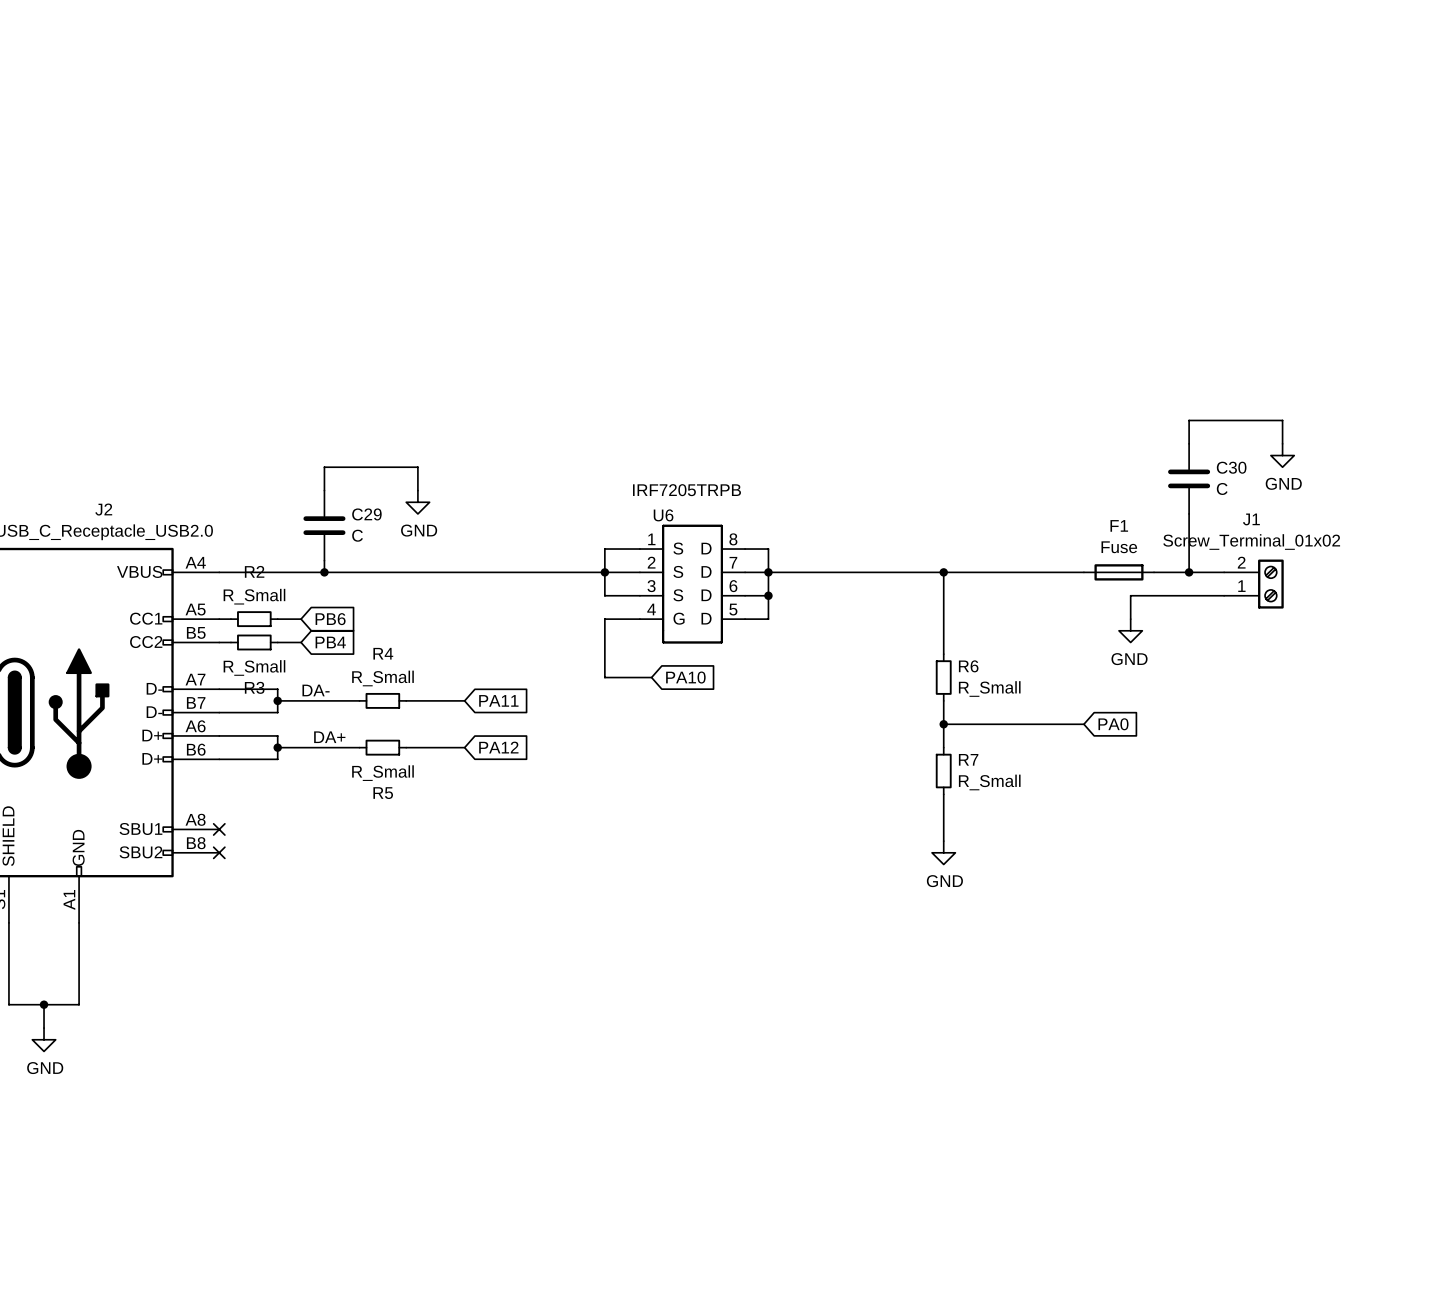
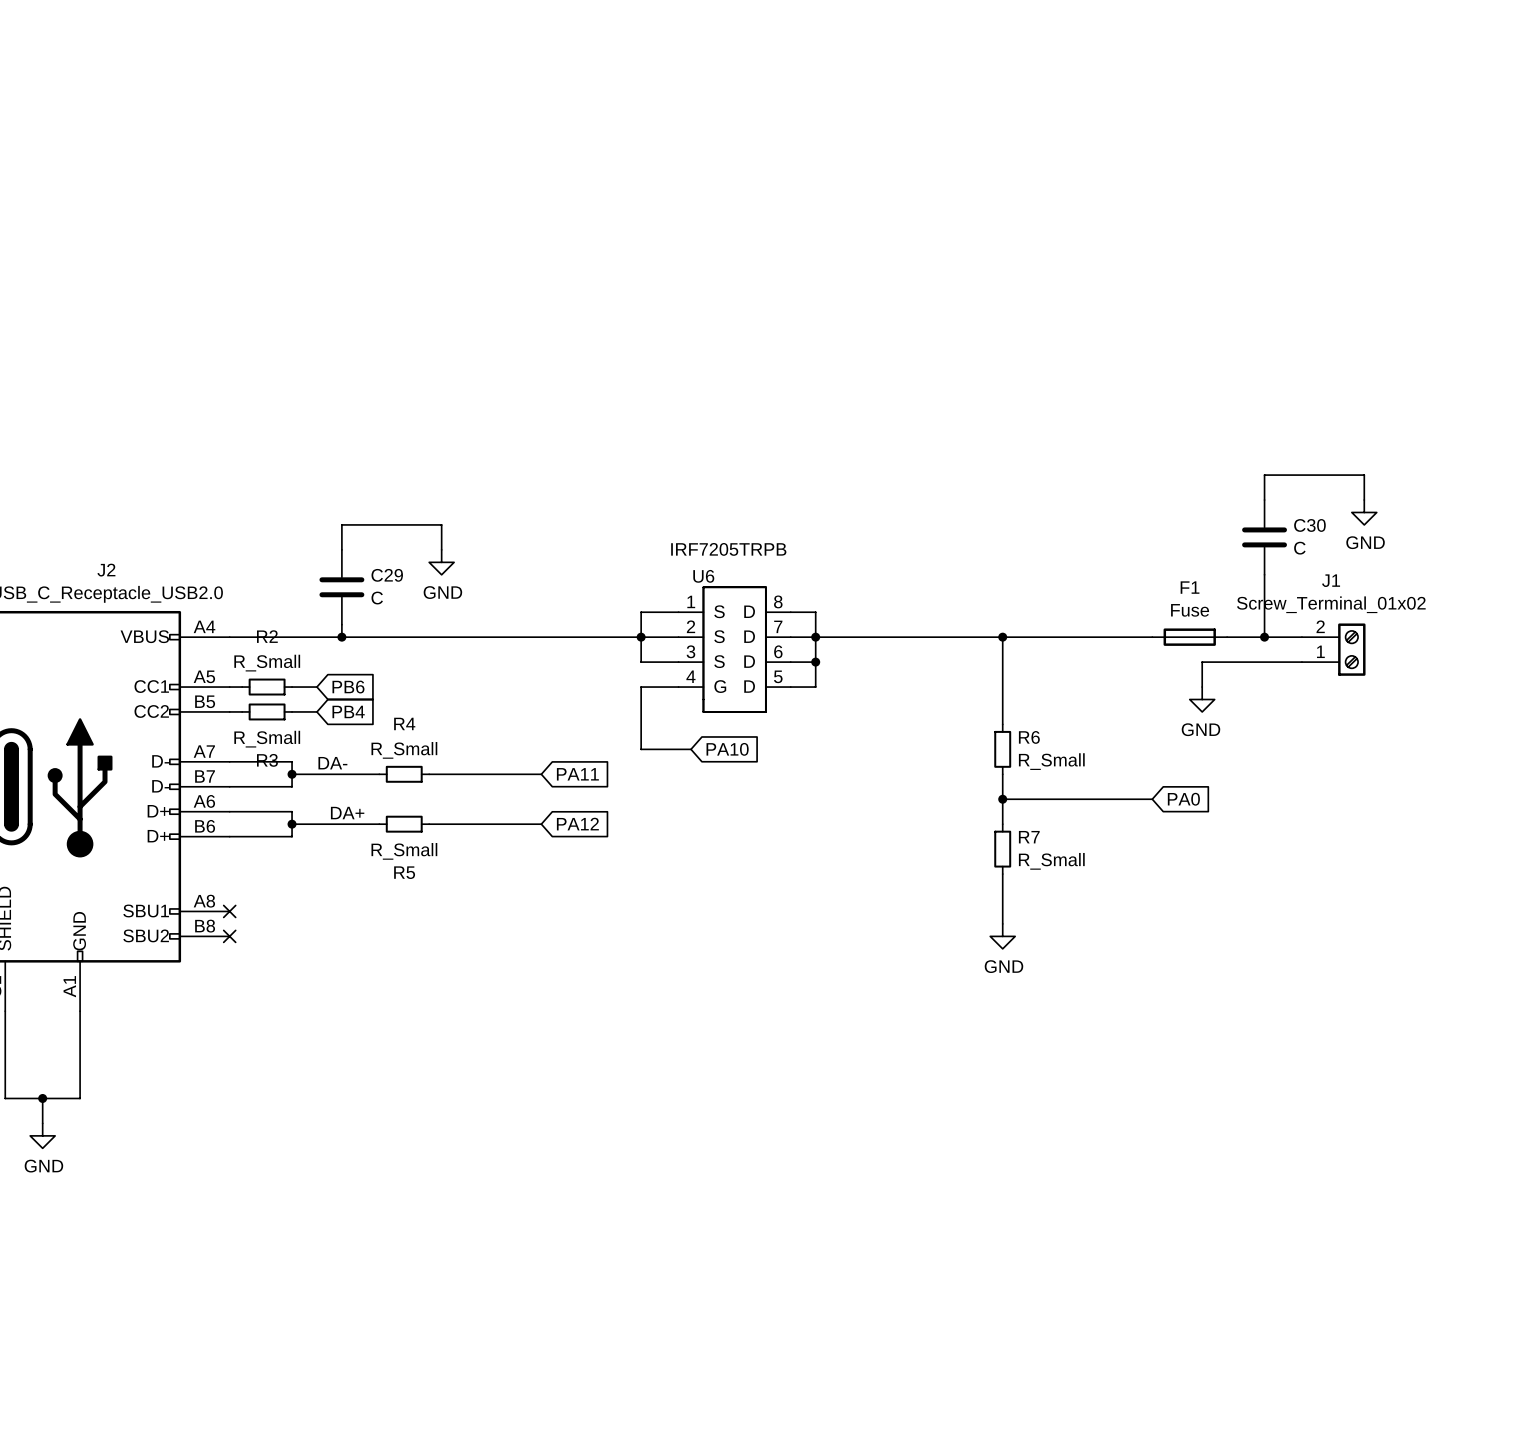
wire: none -> (491, 774) (541, 774)
global label position: PA11 (498, 700) -> PA11 (577, 774)
wire: none -> (491, 824) (541, 824)
global label position: PA12 (498, 747) -> PA12 (577, 824)

